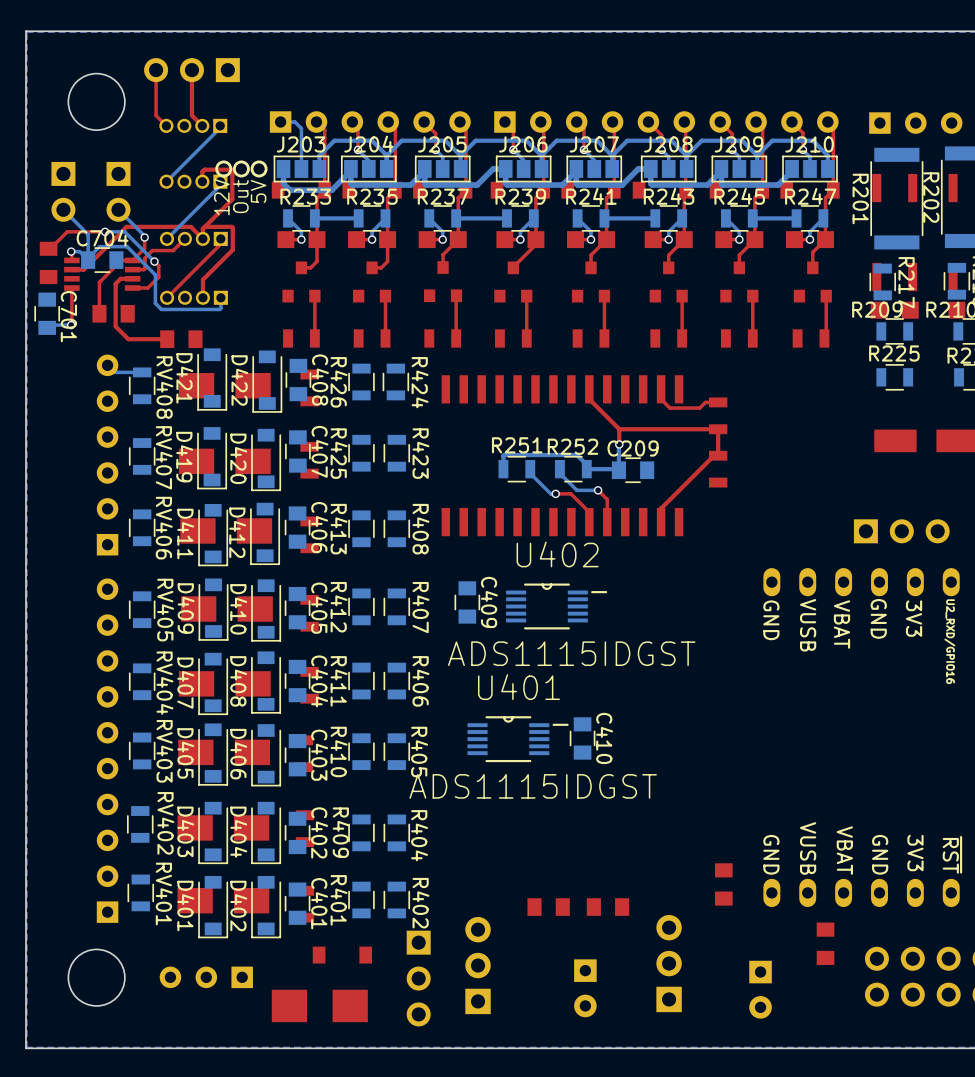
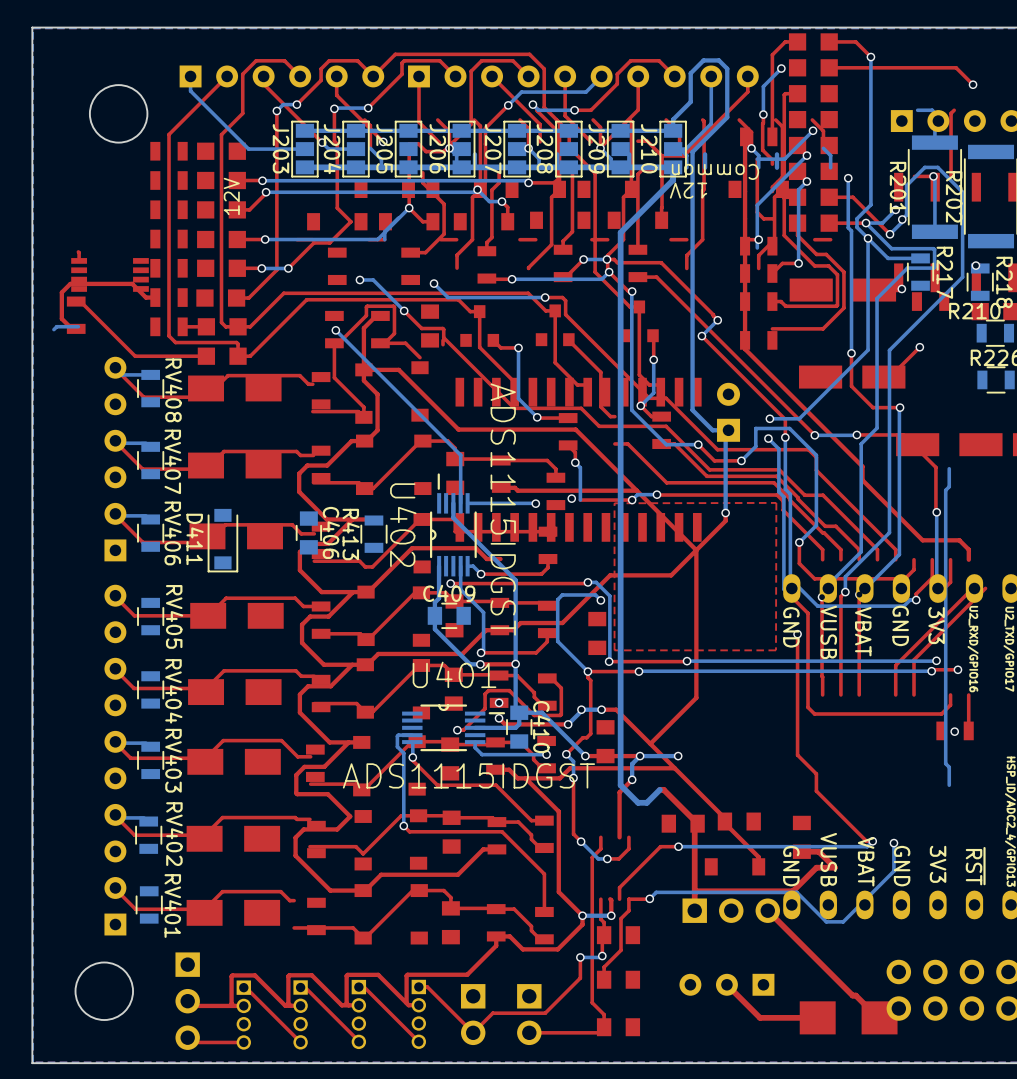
top track: none -> (797, 41) (785, 41) (772, 54) (772, 136)
part: none -> (813, 41)
top track: none -> (829, 41) (855, 41) (870, 57)
bottom track: none -> (870, 57) (870, 204) (857, 218) (857, 227) (888, 258) (920, 258)
via: none -> (870, 57)
top track: (156, 70) (156, 115) (166, 125) -> none
top track: (191, 70) (191, 115) (202, 125) -> none
part: (191, 70) -> none
part: none -> (813, 67)
top track: none -> (829, 67) (956, 67) (973, 84)
bottom track: none -> (781, 68) (763, 86) (763, 114)
via: none -> (781, 68)
bottom track: none -> (190, 76) (190, 91) (248, 149) (304, 149)
top track: none -> (227, 76) (169, 134) (169, 335) (175, 342) (236, 342) (238, 356) (250, 356) (306, 299) (458, 299) (470, 311) (479, 311) (479, 347) (515, 383) (515, 385)
top track: none -> (263, 76) (263, 84) (322, 142)
top track: none -> (300, 76) (284, 60) (256, 60) (242, 74) (242, 113) (221, 134) (221, 322) (225, 326) (250, 326) (283, 293) (528, 293) (545, 310) (555, 310) (555, 362) (577, 384) (587, 384)
top track: none -> (336, 76) (336, 95) (383, 141)
top track: none -> (418, 76) (418, 122) (439, 142)
top track: none -> (455, 76) (439, 60) (404, 60) (402, 63) (402, 74) (368, 108)
top track: none -> (492, 76) (540, 124) (540, 141)
top track: none -> (528, 76) (512, 60) (481, 60) (471, 71) (471, 124) (443, 151) (426, 151) (418, 144) (409, 144) (409, 208) (422, 221) (432, 221)
top track: none -> (565, 76) (565, 115) (591, 141)
bottom track: none -> (601, 76) (586, 92) (521, 92) (508, 105)
top track: none -> (638, 76) (638, 109) (603, 144)
top track: none -> (674, 76) (659, 60) (630, 60) (617, 74) (617, 83) (591, 110) (574, 110)
bottom track: none -> (711, 76) (711, 123) (685, 149) (673, 149)
top track: none -> (747, 76) (747, 91) (683, 155) (662, 155)
via: none -> (973, 84)
top track: none -> (797, 93) (784, 94) (784, 175) (772, 187) (772, 191)
part: none -> (813, 93)
round board edge position: (96, 101) -> (118, 113)
top track: none -> (296, 104) (321, 80) (321, 68) (329, 60) (357, 60) (373, 76) (395, 54) (529, 54) (544, 68) (544, 107) (569, 132) (569, 147) (595, 173) (595, 272) (630, 306) (639, 306) (639, 374) (649, 384) (659, 384) (659, 382)
bottom track: none -> (296, 104) (283, 104) (276, 110)
via: none -> (296, 104)
top track: none -> (532, 104) (558, 132) (558, 178) (554, 182) (528, 182)
bottom track: none -> (532, 104) (538, 110) (574, 110)
via: none -> (532, 104)
top track: none -> (508, 105) (485, 128) (485, 181) (477, 189)
via: none -> (508, 105)
bottom track: none -> (368, 108) (334, 108)
via: none -> (368, 108)
top track: none -> (334, 108) (334, 141) (337, 144) (337, 208) (350, 221) (329, 242) (313, 242) (288, 268)
via: none -> (334, 108)
via: none -> (574, 110)
bottom track: none -> (917, 110) (932, 110) (934, 112) (934, 142)
top track: none -> (954, 110) (951, 113) (951, 176)
top track: none -> (276, 110) (276, 270) (248, 298) (236, 298)
via: none -> (276, 110)
top track: none -> (763, 114) (762, 150) (772, 159) (772, 164)
via: none -> (763, 114)
part: none -> (813, 119)
bottom track: (280, 122) (294, 122) (301, 128) (301, 168) -> none
top track: (316, 122) (324, 130) (324, 190) (316, 197) (316, 261) (310, 267) (301, 267) -> none
part position: (370, 122) -> (281, 76)
top track: (388, 122) (395, 129) (395, 190) (387, 197) (387, 261) (381, 267) (372, 267) -> none
part position: (666, 122) -> (583, 76)
top track: (827, 122) (833, 127) (833, 190) (825, 197) (825, 239) (812, 252) (812, 267) -> none
part: (193, 125) -> none
bottom track: (220, 125) (166, 181) -> none
bottom track: none -> (304, 130) (673, 130) (673, 119) (690, 101) (690, 73) (703, 60) (718, 60) (727, 68) (727, 117) (692, 152) (692, 410) (712, 430) (728, 430) (725, 433) (725, 513)
bottom track: none -> (813, 130) (784, 159) (757, 159)
via: none -> (813, 130)
top track: none -> (745, 136) (745, 349) (862, 466) (862, 480) (922, 540) (959, 540) (968, 549) (968, 559)
top track: none -> (637, 141) (647, 141) (662, 155)
J203 name position: J203 (301, 144) -> J203 (281, 148)
bottom track: none -> (322, 142) (328, 149) (355, 149)
via: none -> (322, 142)
J204 name position: J204 (368, 144) -> J204 (332, 149)
J205 name position: J205 (442, 144) -> J205 (384, 148)
J206 name position: J206 (523, 144) -> J206 (437, 148)
J207 name position: J207 (594, 144) -> J207 (493, 149)
J208 name position: J208 (668, 144) -> J208 (544, 148)
J209 name position: J209 (739, 144) -> J209 (596, 148)
J210 name position: J210 (809, 144) -> J210 (649, 148)
part: none -> (813, 145)
via position: (357, 149) -> (383, 141)
via: (661, 149) -> none
via: (802, 149) -> none
part: none -> (169, 151)
part: none -> (221, 151)
bottom track: (386, 155) (401, 140) (445, 140) (460, 155) (475, 140) (526, 140) (541, 155) (556, 140) (597, 140) (612, 155) (627, 140) (671, 140) (686, 155) (701, 140) (742, 140) (757, 155) (772, 140) (812, 140) (827, 155) (827, 168) -> none
top track: none -> (662, 155) (661, 220)
bottom track: none -> (806, 155) (757, 205) (757, 247)
via: none -> (806, 155)
drawing: [215, 160, 268, 178] -> none
top track: none -> (757, 159) (757, 212) (763, 218) (772, 218)
bottom track: (283, 168) (283, 183) (290, 190) (331, 190) (350, 171) -> none
bottom track: none -> (304, 167) (673, 167) (673, 180) (620, 232) (620, 785) (638, 802) (646, 802) (659, 789)
J203 rotation: 0° (301, 168) -> 90° clockwise (304, 149)
bottom track: (350, 168) (352, 185) (410, 185) (424, 171) -> none
J204 rotation: 0° (368, 168) -> 90° clockwise (355, 149)
bottom track: (386, 168) (386, 155) (372, 140) (334, 140) (319, 155) (319, 168) -> none
bottom track: (424, 168) (426, 185) (477, 185) (493, 168) (505, 168) (507, 185) (562, 185) (576, 171) -> none
J205 rotation: 0° (442, 168) -> 90° clockwise (408, 149)
J205 position: (442, 168) -> (408, 149)
J206 rotation: 0° (523, 168) -> 90° clockwise (461, 149)
J206 position: (523, 168) -> (461, 149)
bottom track: (576, 168) (577, 185) (622, 185) (638, 168) (650, 168) (652, 185) (707, 185) (721, 171) -> none
J207 rotation: 0° (594, 168) -> 90° clockwise (517, 149)
J207 position: (594, 168) -> (517, 149)
J208 rotation: 0° (668, 168) -> 90° clockwise (568, 149)
J208 position: (668, 168) -> (568, 149)
J209 rotation: 0° (739, 168) -> 90° clockwise (620, 149)
J209 position: (739, 168) -> (620, 149)
bottom track: (792, 168) (778, 185) (722, 185) (721, 168) -> none
J210 rotation: 0° (809, 168) -> 90° clockwise (673, 149)
J210 position: (809, 168) -> (673, 149)
top track: none -> (651, 169) (642, 169) (637, 174) (637, 249)
top track: none -> (572, 171) (572, 231) (563, 241) (563, 249)
part: none -> (813, 171)
top track: none -> (422, 172) (422, 182) (444, 204) (444, 234) (425, 252) (410, 252)
top track: none -> (499, 172) (499, 182) (491, 190) (491, 237) (486, 242) (486, 251)
text: none -> Common (715, 171)
top track: none -> (933, 176) (914, 176)
bottom track: none -> (933, 176) (934, 231)
via: none -> (933, 176)
bottom track: none -> (848, 178) (848, 227) (851, 231) (851, 353)
via: none -> (848, 178)
part: none -> (169, 180)
part: (193, 181) -> none
top track: (202, 181) (202, 171) (204, 169) (232, 170) (232, 199) (202, 228) (202, 238) (190, 226) (126, 226) (83, 269) (71, 269) -> none
part: none -> (221, 180)
bottom track: (220, 181) (220, 185) (166, 238) -> none
top track: none -> (237, 180) (262, 180)
bottom track: none -> (262, 180) (526, 180) (528, 182)
via: none -> (262, 180)
bottom track: none -> (806, 181) (798, 189) (798, 263)
via: none -> (806, 181)
via: none -> (528, 182)
part position: (301, 190) -> (337, 221)
via: none -> (477, 189)
part position: (662, 190) -> (637, 220)
part: (809, 190) -> none
part: (63, 191) -> none
part: (118, 191) -> none
text: 5V (258, 191) -> none
text: none -> 12V (688, 190)
top track: none -> (266, 192) (249, 209) (237, 209)
bottom track: none -> (266, 192) (475, 192) (477, 189) (489, 201) (501, 201)
via: none -> (266, 192)
text: Out (240, 196) -> none
part: none -> (813, 197)
top track: none -> (829, 197) (852, 197) (889, 234)
R201 position: (896, 198) -> (934, 187)
top track: none -> (501, 201) (507, 207) (507, 221)
via: none -> (501, 201)
bottom track: none -> (409, 208) (377, 239) (265, 239)
via: none -> (409, 208)
bottom track: (63, 209) (88, 234) (88, 260) (79, 251) (71, 251) -> none
bottom track: (118, 209) (144, 237) -> none
part: none -> (169, 209)
part: none -> (221, 209)
bottom track: none -> (895, 209) (882, 223) (866, 223) (891, 248) (933, 248) (934, 267) (907, 268) (877, 298) (877, 428) (861, 443) (861, 551) (822, 591) (822, 597)
via: none -> (895, 209)
bottom track: (288, 218) (301, 231) (301, 239) -> none
R233 side: bottom (301, 218) -> top (76, 315)
bottom track: (358, 218) (314, 218) -> none
R235 side: bottom (372, 218) -> top (169, 326)
bottom track: (429, 218) (442, 231) (442, 239) -> none
R237 side: bottom (442, 218) -> top (169, 297)
bottom track: (506, 218) (456, 218) -> none
R239: (520, 218) -> none
bottom track: (533, 218) (520, 231) (520, 239) -> none
bottom track: (577, 218) (591, 231) (591, 239) -> none
R241: (591, 218) -> none
bottom track: (655, 218) (604, 218) -> none
R243: (668, 218) -> none
bottom track: (682, 218) (668, 231) (668, 239) -> none
bottom track: (725, 218) (739, 231) (739, 239) -> none
R245: (739, 218) -> none
bottom track: (796, 218) (752, 218) -> none
R247: (809, 218) -> none
bottom track: (823, 218) (809, 231) (809, 239) -> none
via: none -> (902, 219)
part: none -> (560, 220)
part: none -> (409, 221)
part: none -> (484, 221)
top track: none -> (797, 223) (797, 235) (816, 254) (826, 254) (843, 272) (843, 307) (823, 328) (772, 328)
part: none -> (813, 223)
top track: none -> (865, 223) (829, 223)
via: none -> (866, 223)
top track: (204, 226) (231, 226) (232, 249) (202, 279) (202, 297) -> none
top track: (105, 231) (67, 231) (48, 248) -> none
bottom track: (105, 231) (124, 231) (154, 261) -> none
via: (105, 231) -> none
part footprint: [715, 231, 764, 249] -> [740, 236, 778, 256]
bottom track: none -> (889, 234) (906, 215) (906, 185) (924, 167) (937, 167) (962, 192) (962, 277) (889, 350) (889, 532) (845, 576) (845, 592)
via: none -> (889, 234)
top track: (144, 237) (144, 248) (132, 260) (121, 260) (99, 282) (99, 313) -> none
via: (144, 237) -> none
part: none -> (169, 239)
top track: (184, 238) (173, 250) (152, 250) (145, 257) (143, 269) (132, 269) -> none
part: (193, 238) -> none
top track: (220, 238) (220, 244) (167, 297) -> none
bottom track: none -> (868, 238) (868, 350) (799, 418) (769, 418)
via: none -> (868, 238)
part: none -> (221, 239)
top track: none -> (265, 239) (237, 239)
via: none -> (265, 239)
part: (301, 239) -> none
via: (301, 239) -> none
part: (372, 239) -> none
via: (372, 239) -> none
part: (442, 239) -> none
via: (442, 239) -> none
part: (520, 239) -> none
via: (520, 239) -> none
part: (591, 239) -> none
via: (591, 239) -> none
part: (668, 239) -> none
via: (668, 239) -> none
part: (809, 239) -> none
via: (809, 239) -> none
via: (71, 251) -> none
bottom track: (88, 258) (99, 246) (127, 246) (155, 274) (155, 303) (161, 309) (219, 309) (220, 297) -> none
top track: none -> (583, 259) (565, 277) (563, 277)
via: none -> (583, 259)
top track: none -> (606, 259) (614, 259) (617, 262) (661, 262) (717, 320)
bottom track: none -> (606, 259) (583, 259)
via: none -> (606, 259)
C704: (102, 260) -> none
top track: (154, 261) (158, 265) (158, 277) (147, 287) (132, 287) -> none
via: (154, 261) -> none
part footprint: [793, 261, 832, 303] -> [789, 278, 897, 302]
part: (48, 262) -> none
part: none -> (563, 263)
part: none -> (637, 263)
top track: none -> (798, 263) (782, 263) (772, 273)
via: none -> (798, 263)
part: none -> (486, 264)
part: none -> (337, 266)
part: none -> (410, 266)
via: none -> (975, 265)
part: none -> (169, 268)
part: none -> (221, 268)
top track: none -> (261, 268) (237, 268)
via: none -> (261, 268)
bottom track: none -> (288, 268) (261, 268)
via: none -> (288, 268)
top track: none -> (609, 272) (628, 291) (632, 291)
bottom track: none -> (609, 272) (601, 279) (512, 279)
via: none -> (609, 272)
part: none -> (758, 273)
top track: none -> (637, 277) (656, 277) (814, 435)
top track: none -> (486, 278) (512, 279)
top track: (132, 278) (120, 278) (115, 283) (115, 326) (128, 339) (167, 339) -> none
via: none -> (512, 279)
bottom track: none -> (359, 279) (373, 279) (404, 310)
via: none -> (359, 279)
part: (301, 281) -> none
part: (372, 281) -> none
part: (443, 281) -> none
part: (513, 281) -> none
part: (591, 281) -> none
part: (668, 281) -> none
part: (739, 281) -> none
R217 position: (882, 281) -> (920, 272)
bottom track: none -> (434, 283) (447, 297) (545, 297)
via: none -> (434, 283)
top track: (71, 287) (71, 325) -> none
via: none -> (901, 288)
bottom track: none -> (632, 291) (631, 410) (666, 444) (698, 444)
via: none -> (632, 291)
top track: (456, 295) (456, 338) -> none
top track: none -> (155, 297) (145, 297) (132, 283) (70, 283) (61, 292) (61, 318) (71, 328) (76, 328)
part: none -> (220, 298)
top track: (314, 296) (314, 338) -> none
top track: (385, 296) (385, 338) -> none
top track: (526, 296) (526, 338) -> none
top track: none -> (545, 297) (562, 297) (565, 300) (565, 314) (649, 398) (666, 398) (717, 449) (808, 449) (816, 457) (816, 470) (895, 549) (895, 559)
via: none -> (545, 297)
top track: (604, 296) (604, 338) -> none
top track: (682, 296) (682, 338) -> none
top track: (826, 296) (826, 336) (824, 338) -> none
part: (193, 297) -> none
top track: none -> (76, 301) (80, 301) (135, 356) (206, 356)
part: none -> (758, 301)
top track: (752, 300) (752, 338) -> (772, 301) (781, 301) (785, 306) (837, 305) (837, 274) (828, 265) (814, 265) (784, 235) (784, 198) (797, 197)
top track: none -> (404, 310) (421, 328) (442, 328) (443, 337) (514, 408) (581, 408) (599, 426) (666, 426) (709, 469) (779, 469) (804, 495) (823, 495) (877, 549) (877, 559)
via: none -> (404, 310)
part: (894, 310) -> none
C701: (47, 313) -> none
part: (113, 313) -> none
top track: none -> (380, 315) (376, 315) (363, 328) (363, 380) (377, 394) (377, 430) (366, 441) (351, 441) (327, 465) (307, 465) (299, 473) (299, 491) (326, 519) (365, 519)
bottom track: none -> (717, 320) (701, 336)
via: none -> (717, 320)
part: none -> (639, 321)
part: none -> (555, 325)
part: none -> (479, 326)
via: (71, 325) -> none
top track: none -> (206, 326) (182, 326)
part: none -> (222, 326)
bottom track: none -> (335, 330) (460, 455) (460, 503)
via: none -> (335, 330)
R209 side: bottom (894, 331) -> top (758, 136)
top track: none -> (653, 335) (653, 359)
top track: none -> (701, 336) (785, 419) (785, 437)
via: none -> (701, 336)
top track: none -> (568, 339) (600, 372) (600, 406) (610, 416) (614, 416)
part: (301, 338) -> none
part rotation: 0° (372, 338) -> 90° clockwise (380, 329)
part: (442, 338) -> none
top track: none -> (493, 340) (500, 347) (518, 347)
part: (513, 338) -> none
part: (591, 338) -> none
part: (668, 338) -> none
part: (811, 338) -> none
part: (181, 339) -> none
top track: none -> (380, 343) (405, 343) (419, 357)
top track: none -> (384, 343) (394, 333) (394, 307) (367, 306) (366, 315) (338, 343) (334, 343) (334, 377) (363, 407) (363, 417) (358, 411) (312, 411)
bottom track: none -> (518, 347) (518, 398) (537, 417)
via: none -> (518, 347)
top track: none -> (919, 347) (889, 377) (883, 377)
via: none -> (919, 347)
top track: none -> (851, 353) (851, 386) (872, 407) (900, 407)
via: none -> (851, 353)
part: none -> (222, 356)
bottom track: none -> (653, 359) (653, 392) (640, 405)
via: none -> (653, 359)
top track: none -> (110, 364) (143, 397) (206, 397) (227, 375) (299, 375) (308, 384) (312, 384)
top track: none -> (363, 369) (398, 369) (458, 429) (575, 429) (696, 550) (696, 697) (650, 743)
part: none -> (852, 377)
R225 side: bottom (894, 377) -> top (930, 301)
D421 side: bottom (212, 379) -> top (363, 393)
C408 side: bottom (298, 380) -> top (430, 326)
D422 side: bottom (267, 381) -> top (419, 391)
R426: (361, 382) -> none
R424 side: bottom (395, 382) -> top (334, 329)
top track: (589, 389) (589, 399) (619, 429) (718, 429) (718, 455) (713, 455) (661, 508) (661, 522) -> none
top track: (661, 389) (661, 399) (669, 408) (699, 408) (705, 402) (718, 402) -> none
part footprint: [708, 397, 728, 435] -> [717, 382, 741, 442]
top track: none -> (640, 405) (651, 416) (661, 416)
via: none -> (640, 405)
bottom track: none -> (900, 407) (899, 554) (859, 594)
via: none -> (900, 407)
top track: none -> (537, 417) (568, 418)
via: none -> (537, 417)
via: none -> (769, 418)
part: none -> (661, 430)
part: none -> (568, 431)
top track: (619, 429) (619, 444) -> none
via: none -> (814, 435)
top track: none -> (856, 434) (903, 434) (935, 467) (936, 512)
bottom track: none -> (856, 434) (814, 435)
via: none -> (856, 434)
top track: none -> (110, 437) (142, 469) (206, 469) (224, 451) (296, 451) (300, 455) (313, 455)
bottom track: none -> (110, 437) (116, 443) (145, 443)
bottom track: none -> (785, 437) (785, 489) (790, 494) (790, 578) (817, 606) (904, 606) (910, 600) (916, 600)
via: none -> (785, 437)
bottom track: none -> (768, 438) (778, 448) (778, 491) (783, 496) (783, 589) (789, 594)
via: none -> (768, 438)
top track: none -> (614, 443) (627, 443) (666, 482) (774, 482) (840, 549) (840, 559)
top track: none -> (661, 443) (674, 443) (706, 476) (776, 476) (825, 526) (835, 526) (859, 549) (859, 559)
top track: none -> (698, 444) (714, 460) (741, 460)
via: none -> (698, 444)
top track: none -> (568, 445) (575, 452) (575, 462)
bottom track: (619, 444) (618, 470) (586, 469) (586, 464) (576, 455) (504, 455) (503, 469) -> none
via: (619, 444) -> none
C407 side: bottom (297, 451) -> top (455, 473)
R425 side: bottom (361, 453) -> top (501, 474)
R423 side: bottom (396, 453) -> top (555, 491)
bottom track: none -> (741, 460) (755, 446) (755, 428) (789, 428) (816, 455) (816, 525) (799, 542)
via: none -> (741, 460)
D419 side: bottom (212, 458) -> top (364, 464)
bottom track: none -> (575, 462) (580, 467) (580, 500)
via: none -> (575, 462)
D420 side: bottom (266, 459) -> top (422, 464)
bottom track: none -> (949, 468) (949, 486) (945, 490) (945, 763) (949, 767) (949, 785)
R251: (516, 469) -> none
bottom track: (530, 469) (530, 473) (550, 493) (555, 493) -> none
bottom track: (559, 469) (559, 473) (576, 490) (598, 490) -> none
R252: (573, 469) -> none
part: (718, 469) -> none
C209: (633, 470) -> none
top track: none -> (555, 477) (555, 469) (547, 460) (455, 459) (455, 448) (448, 441) (420, 441) (373, 488) (364, 488) (358, 482) (313, 482)
top track: none -> (501, 487) (514, 487) (517, 490) (636, 490)
top track: none -> (656, 494) (777, 495) (783, 501) (783, 510) (822, 549) (822, 559)
bottom track: none -> (656, 494) (637, 494) (632, 500)
via: none -> (656, 494)
top track: (598, 490) (607, 499) (607, 522) -> none
via position: (598, 490) -> (632, 500)
top track: (555, 493) (570, 493) (589, 512) (589, 522) -> none
top track: none -> (632, 500) (580, 500)
bottom track: none -> (453, 503) (453, 517) (515, 580) (515, 709) (519, 712)
bottom track: none -> (467, 503) (535, 503)
via: none -> (535, 503)
top zone outline: none -> (776, 502) (775, 650) (614, 650) (614, 503) (776, 502)
top track: none -> (110, 510) (142, 542) (207, 542) (225, 524) (292, 524) (301, 533) (314, 533)
bottom track: none -> (110, 510) (116, 515) (145, 515)
bottom track: none -> (936, 512) (935, 597)
via: none -> (936, 512)
top track: none -> (725, 513) (725, 520) (671, 575) (610, 575) (562, 623) (520, 623) (513, 630) (486, 630) (462, 653) (378, 653) (367, 664) (323, 664) (302, 642) (302, 624) (310, 616) (328, 616) (353, 592)
via: none -> (725, 513)
top track: none -> (352, 519) (327, 543) (308, 543) (299, 552) (299, 570) (321, 592) (368, 592) (412, 548) (476, 548) (486, 559) (500, 559)
top track: none -> (548, 531) (455, 531) (453, 519) (419, 519) (372, 566) (365, 566) (359, 561) (314, 561)
R408 side: bottom (396, 528) -> top (548, 545)
part: (901, 531) -> none
D412 side: bottom (265, 533) -> top (422, 543)
top track: none -> (799, 542) (799, 563) (814, 578) (905, 578) (914, 569) (914, 559)
via: none -> (799, 542)
top track: none -> (548, 559) (548, 567) (541, 574) (481, 574)
top track: none -> (932, 559) (932, 577) (916, 593) (916, 600)
top track: none -> (950, 559) (950, 582) (935, 597)
bottom track: none -> (439, 566) (439, 598) (434, 602) (434, 629) (470, 664) (480, 664)
bottom track: none -> (460, 566) (460, 589) (483, 612) (483, 650) (481, 652)
bottom track: none -> (467, 566) (473, 566) (481, 574)
via: none -> (481, 574)
top track: none -> (587, 582) (450, 583)
bottom track: none -> (587, 582) (596, 582) (609, 596) (609, 661)
via: none -> (587, 582)
via: none -> (450, 583)
top track: none -> (971, 589) (895, 665) (895, 694)
top track: none -> (985, 588) (914, 659) (914, 694)
top track: none -> (110, 592) (134, 615) (208, 615) (226, 598) (295, 598) (303, 606) (316, 606)
top track: none -> (845, 592) (840, 596) (840, 694)
via: none -> (845, 592)
top track: none -> (789, 594) (807, 613) (807, 707) (814, 714) (941, 714) (950, 705) (950, 694)
top track: none -> (859, 594) (859, 694)
via: none -> (859, 594)
top track: none -> (822, 597) (822, 694)
via: none -> (822, 597)
bottom track: none -> (600, 600) (595, 594) (562, 594) (557, 599) (557, 641) (587, 671)
via: none -> (600, 600)
via: none -> (916, 600)
top track: none -> (547, 605) (544, 602) (454, 601) (445, 592) (414, 592) (368, 639) (360, 633) (316, 633)
C409 rotation: 0° (467, 602) -> 90° clockwise (449, 615)
C409 position: (467, 602) -> (449, 615)
C409 name position: C409 (489, 602) -> C409 (449, 593)
R412 side: bottom (361, 606) -> top (499, 616)
R407 side: bottom (396, 606) -> top (547, 619)
U402 rotation: 0° (556, 606) -> 90° counterclockwise (453, 524)
U402 position: (556, 606) -> (453, 524)
C405 side: bottom (297, 608) -> top (454, 615)
D409 side: bottom (213, 609) -> top (366, 615)
D410 side: bottom (266, 610) -> top (421, 616)
top track: none -> (547, 633) (547, 641) (536, 652) (481, 652)
part: none -> (597, 633)
top track: none -> (797, 634) (797, 755) (816, 773) (816, 791) (866, 841) (872, 841)
via: none -> (797, 634)
via: none -> (481, 652)
via: none -> (609, 661)
top track: none -> (687, 661) (609, 661)
via: none -> (687, 661)
bottom track: none -> (936, 660) (687, 661)
via: none -> (936, 660)
via: none -> (480, 664)
top track: none -> (515, 664) (480, 664)
via: none -> (515, 664)
top track: none -> (110, 665) (134, 688) (206, 688) (224, 670) (295, 670) (301, 676) (314, 676)
top track: none -> (352, 664) (330, 686) (308, 686) (299, 694) (299, 712) (329, 742) (361, 742)
top track: none -> (957, 669) (931, 671)
via: none -> (957, 669)
via: none -> (587, 671)
top track: none -> (638, 671) (587, 671) (587, 677) (590, 680) (590, 733) (586, 737) (582, 737) (566, 754)
via: none -> (638, 671)
bottom track: none -> (931, 671) (638, 671)
via: none -> (931, 671)
top track: none -> (547, 678) (551, 678) (561, 688) (560, 715) (534, 715) (509, 690) (488, 690) (485, 694) (485, 708) (463, 730) (457, 730)
C404 side: bottom (297, 681) -> top (453, 689)
R411 side: bottom (361, 681) -> top (499, 689)
R406 side: bottom (396, 681) -> top (547, 692)
D408 side: bottom (266, 682) -> top (421, 689)
D407 side: bottom (213, 683) -> top (365, 688)
top track: none -> (968, 695) (968, 730) (966, 728)
via: none -> (499, 702)
top track: none -> (314, 703) (356, 703) (365, 712) (372, 712) (419, 665) (444, 665) (453, 674) (517, 675) (534, 692) (534, 697) (542, 705) (547, 705)
via: none -> (581, 709)
top track: none -> (601, 709) (616, 709) (724, 818) (724, 823) (758, 857) (758, 866)
bottom track: none -> (601, 709) (581, 709) (568, 724)
via: none -> (601, 709)
bottom track: none -> (519, 712) (542, 712) (585, 756)
bottom track: none -> (519, 712) (519, 724) (515, 727) (475, 727)
top track: none -> (499, 718) (505, 724) (568, 724)
via: none -> (499, 718)
via: none -> (568, 724)
via: none -> (457, 730)
via: none -> (954, 731)
part: none -> (955, 730)
bottom track: none -> (412, 735) (397, 736) (397, 746) (403, 753) (403, 825)
top track: none -> (110, 738) (130, 758) (205, 758) (223, 740) (281, 740) (297, 756) (310, 756)
bottom track: none -> (110, 738) (115, 743) (145, 743)
bottom track: none -> (412, 742) (412, 757)
bottom track: none -> (475, 742) (475, 747) (482, 754) (546, 754)
part: none -> (605, 741)
top track: none -> (348, 742) (324, 766) (304, 766) (296, 775) (297, 794) (327, 794) (350, 816) (337, 829) (303, 829) (295, 837) (295, 855) (330, 890) (365, 890) (381, 874) (457, 874) (483, 849) (496, 849)
C410 position: (582, 738) -> (519, 727)
U401 position: (518, 739) -> (453, 727)
bottom track: none -> (566, 754) (573, 761) (573, 778)
via: none -> (566, 754)
via: none -> (546, 754)
via: none -> (585, 756)
top track: none -> (640, 756) (585, 756)
via: none -> (640, 756)
bottom track: none -> (678, 756) (640, 756) (632, 763) (632, 779)
via: none -> (678, 756)
top track: none -> (412, 757) (412, 760) (437, 785) (496, 785) (531, 820) (544, 820)
via: none -> (412, 757)
R410 side: bottom (361, 751) -> top (495, 756)
R405 side: bottom (396, 751) -> top (546, 754)
D405 side: bottom (213, 754) -> top (361, 766)
D406 side: bottom (266, 755) -> top (417, 765)
C403 side: bottom (297, 755) -> top (450, 758)
top track: none -> (546, 768) (542, 768) (533, 759) (533, 755) (520, 742) (450, 744) (447, 741) (412, 741) (363, 789) (355, 784) (310, 784)
top track: none -> (674, 768) (570, 768) (559, 778) (517, 778) (509, 769) (495, 769)
top track: none -> (525, 778) (558, 811) (558, 892) (582, 915) (582, 924) (557, 949) (522, 949) (509, 936) (496, 936) (496, 945) (467, 974) (407, 974) (406, 1003)
top track: none -> (573, 778) (573, 834) (581, 841)
via: none -> (573, 778)
top track: none -> (632, 779) (619, 792) (619, 837)
via: none -> (632, 779)
top track: none -> (659, 789) (663, 789) (697, 823) (694, 826) (694, 910)
top track: none -> (110, 811) (134, 835) (204, 835) (222, 817) (309, 819)
bottom track: none -> (110, 811) (117, 817) (144, 817)
part: none -> (739, 821)
part: none -> (683, 823)
top track: none -> (403, 825) (409, 831) (502, 831) (544, 874) (544, 911)
via: none -> (403, 825)
top track: none -> (600, 837) (600, 848) (592, 857) (592, 1002) (604, 1014) (604, 1027) (598, 1032) (529, 1032)
top track: none -> (628, 837) (628, 848) (618, 858) (607, 858)
part: none -> (801, 837)
bottom track: none -> (581, 841) (598, 858) (607, 858)
via: none -> (581, 841)
bottom track: none -> (872, 841) (867, 846) (678, 846)
via: none -> (872, 841)
D403 side: bottom (213, 832) -> top (363, 840)
D404 side: bottom (266, 832) -> top (418, 839)
C402 side: bottom (297, 832) -> top (451, 832)
R409 side: bottom (361, 832) -> top (496, 835)
R404 side: bottom (396, 832) -> top (544, 834)
bottom track: none -> (893, 843) (893, 871) (843, 921) (826, 921) (796, 892) (656, 892) (649, 898)
via: none -> (893, 843)
top track: none -> (309, 846) (355, 846) (363, 853) (401, 815) (449, 815) (451, 817) (492, 817) (496, 822) (518, 822) (531, 835) (531, 839) (540, 847) (544, 847)
top track: none -> (678, 846) (660, 846) (619, 887) (619, 899)
via: none -> (678, 846)
top track: none -> (801, 851) (818, 851) (834, 867) (816, 867) (792, 891) (694, 892)
via: none -> (607, 858)
part: none -> (735, 866)
top track: none -> (110, 884) (135, 909) (204, 909) (222, 891) (280, 891) (289, 900) (294, 900)
part: (723, 884) -> none
top track: none -> (649, 898) (628, 899) (628, 910) (621, 918) (621, 950) (604, 967) (604, 979)
via: none -> (649, 898)
top track: none -> (600, 899) (600, 919) (604, 922) (602, 956)
top track: none -> (610, 899) (611, 915)
part: none -> (731, 910)
top track: none -> (767, 910) (852, 995) (855, 995) (879, 1017)
R401 side: bottom (361, 900) -> top (496, 922)
R402 side: bottom (396, 900) -> top (544, 925)
C401 side: bottom (297, 903) -> top (450, 922)
via: none -> (582, 915)
bottom track: none -> (611, 915) (582, 915)
via: none -> (611, 915)
D401 side: bottom (213, 907) -> top (363, 914)
D402 side: bottom (266, 907) -> top (419, 914)
part: (548, 907) -> none
part position: (607, 907) -> (618, 935)
top track: none -> (294, 927) (353, 927) (365, 938) (412, 890) (443, 890) (450, 897) (450, 908) (514, 909) (531, 926) (531, 930) (540, 939) (544, 939)
bottom track: none -> (602, 956) (580, 957)
via: none -> (602, 956)
part: (825, 943) -> none
top track: none -> (580, 957) (580, 978) (545, 1013) (492, 1013) (473, 1032) (427, 986) (418, 986)
via: none -> (580, 957)
part: (342, 955) -> none
part: (669, 963) -> none
part: (478, 965) -> none
part: none -> (618, 979)
top track: none -> (726, 984) (760, 1017) (817, 1017)
part: none -> (726, 984)
top track: none -> (358, 987) (364, 987) (418, 1041)
top track: none -> (243, 987) (300, 1042)
top track: none -> (300, 987) (305, 987) (358, 1041)
part: (206, 977) -> none
part: (418, 978) -> none
top track: none -> (187, 1001) (192, 1005) (243, 1005)
part: none -> (187, 1001)
part: (585, 988) -> none
part: (760, 989) -> none
top track: none -> (300, 1005) (285, 1005) (255, 975) (232, 975) (231, 1003) (233, 1005)
top track: none -> (358, 1005) (341, 1005) (311, 975) (289, 975) (288, 1003) (290, 1005)
top track: none -> (418, 1005) (408, 1005) (378, 974) (347, 974) (346, 1003) (348, 1005)
part: none -> (300, 1014)
part: none -> (358, 1014)
part: none -> (418, 1014)
part: none -> (473, 1014)
part: none -> (529, 1014)
part: none -> (243, 1015)
part: none -> (848, 1017)
part: (319, 1005) -> none
part: none -> (618, 1027)
top track: none -> (187, 1037) (192, 1042) (243, 1042)

